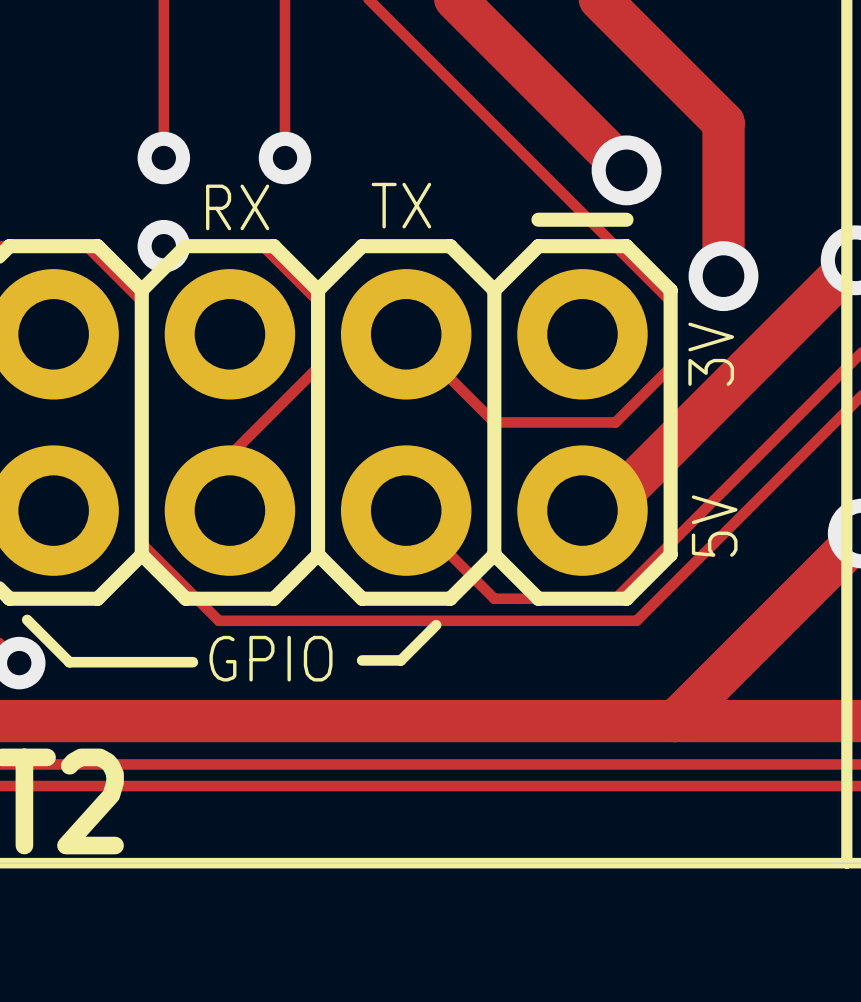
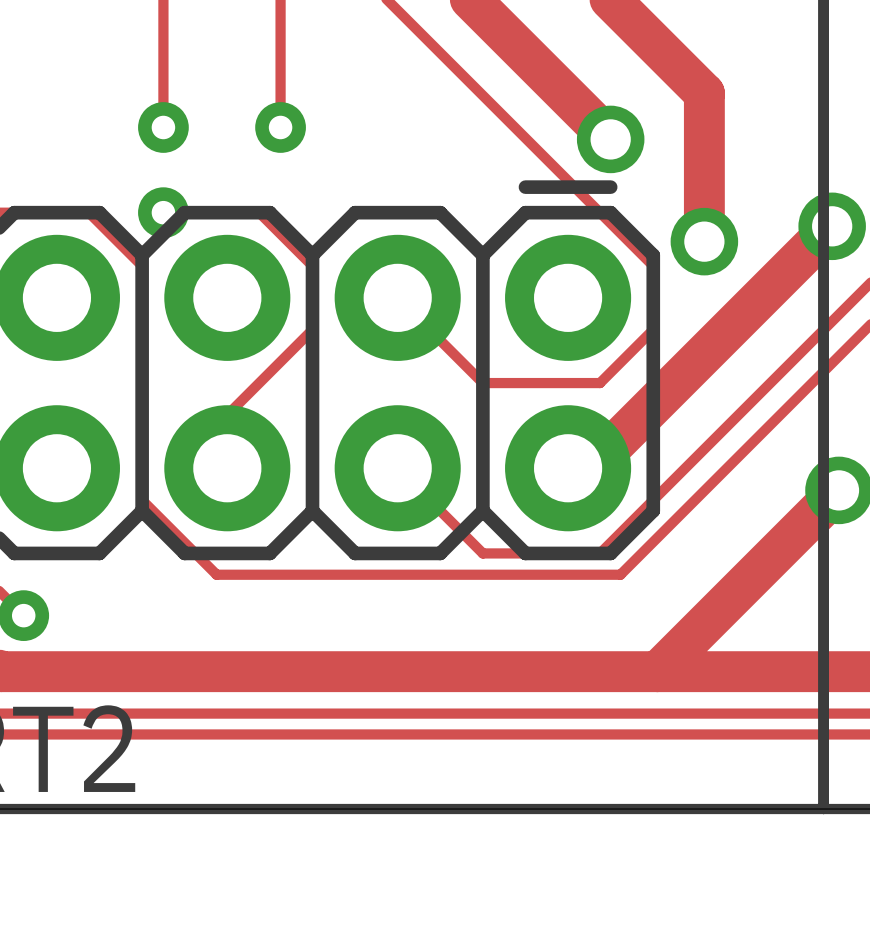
text: TX (401, 205) -> none
text: RX (237, 207) -> none
text: 3V (711, 354) -> none
text: 5V (714, 526) -> none
line: (27, 619) (69, 662) (192, 662) -> none
line: (436, 625) (400, 660) (362, 660) -> none
text: GPIO (271, 658) -> none

